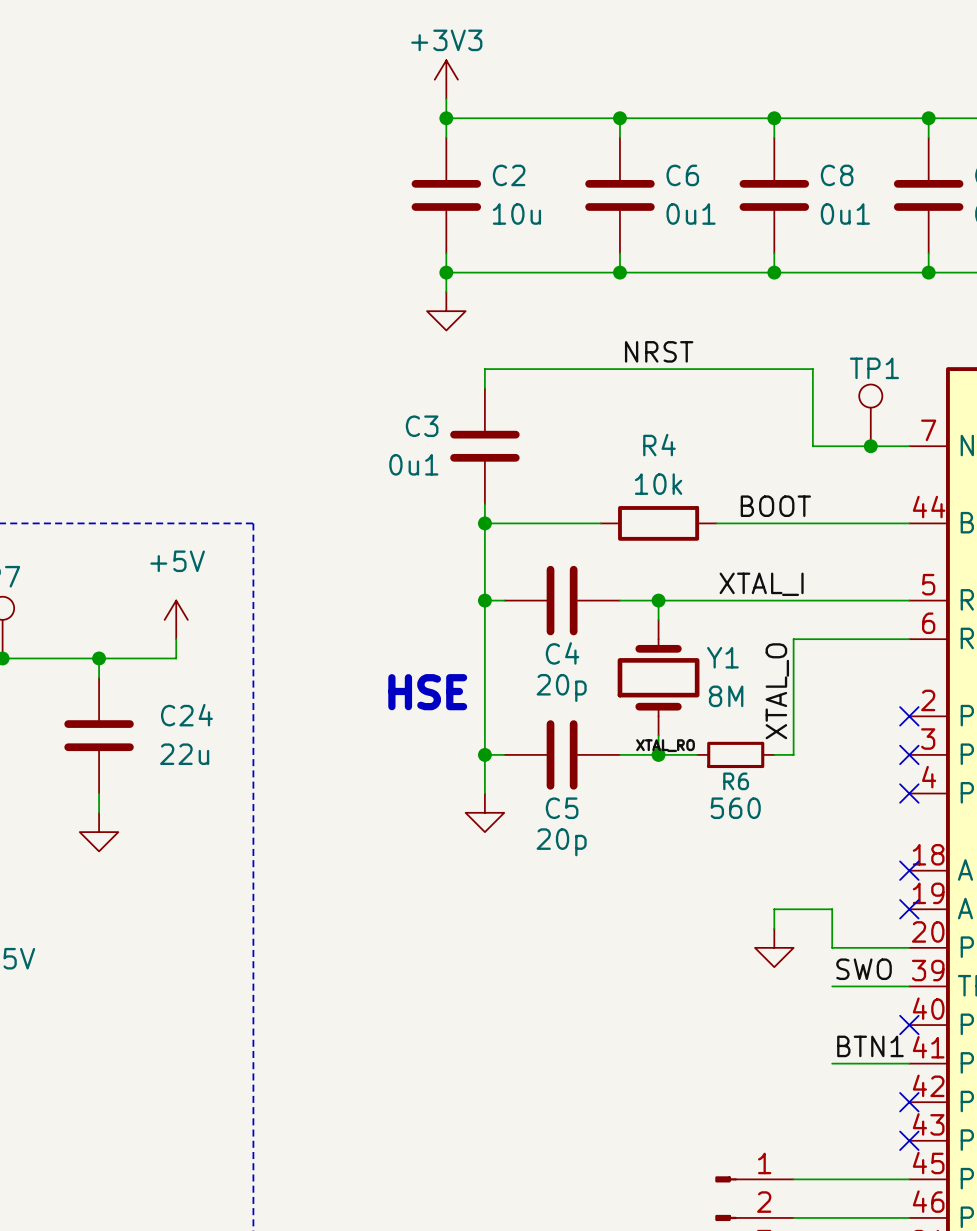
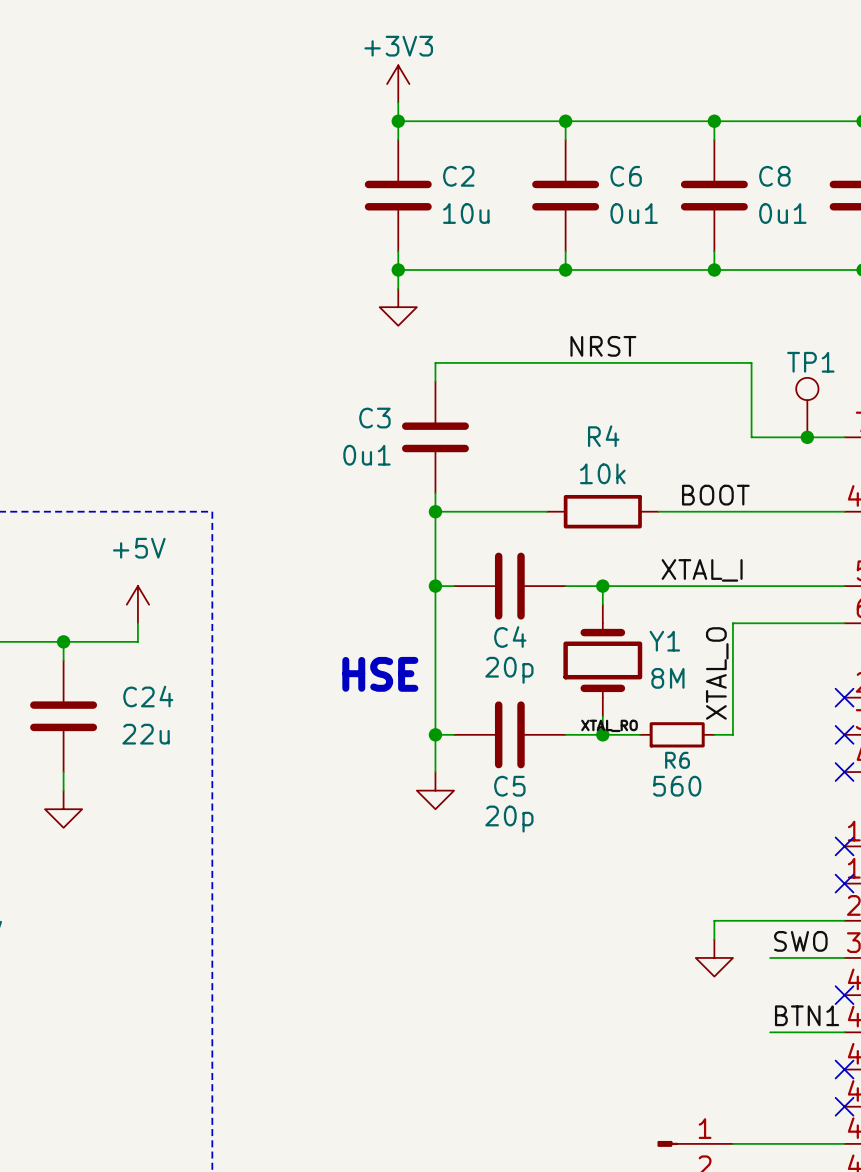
wire: (774, 928) (774, 909) (832, 909) (832, 947) -> (714, 939) (714, 920) (770, 920)
power symbol position: (774, 947) -> (714, 957)

